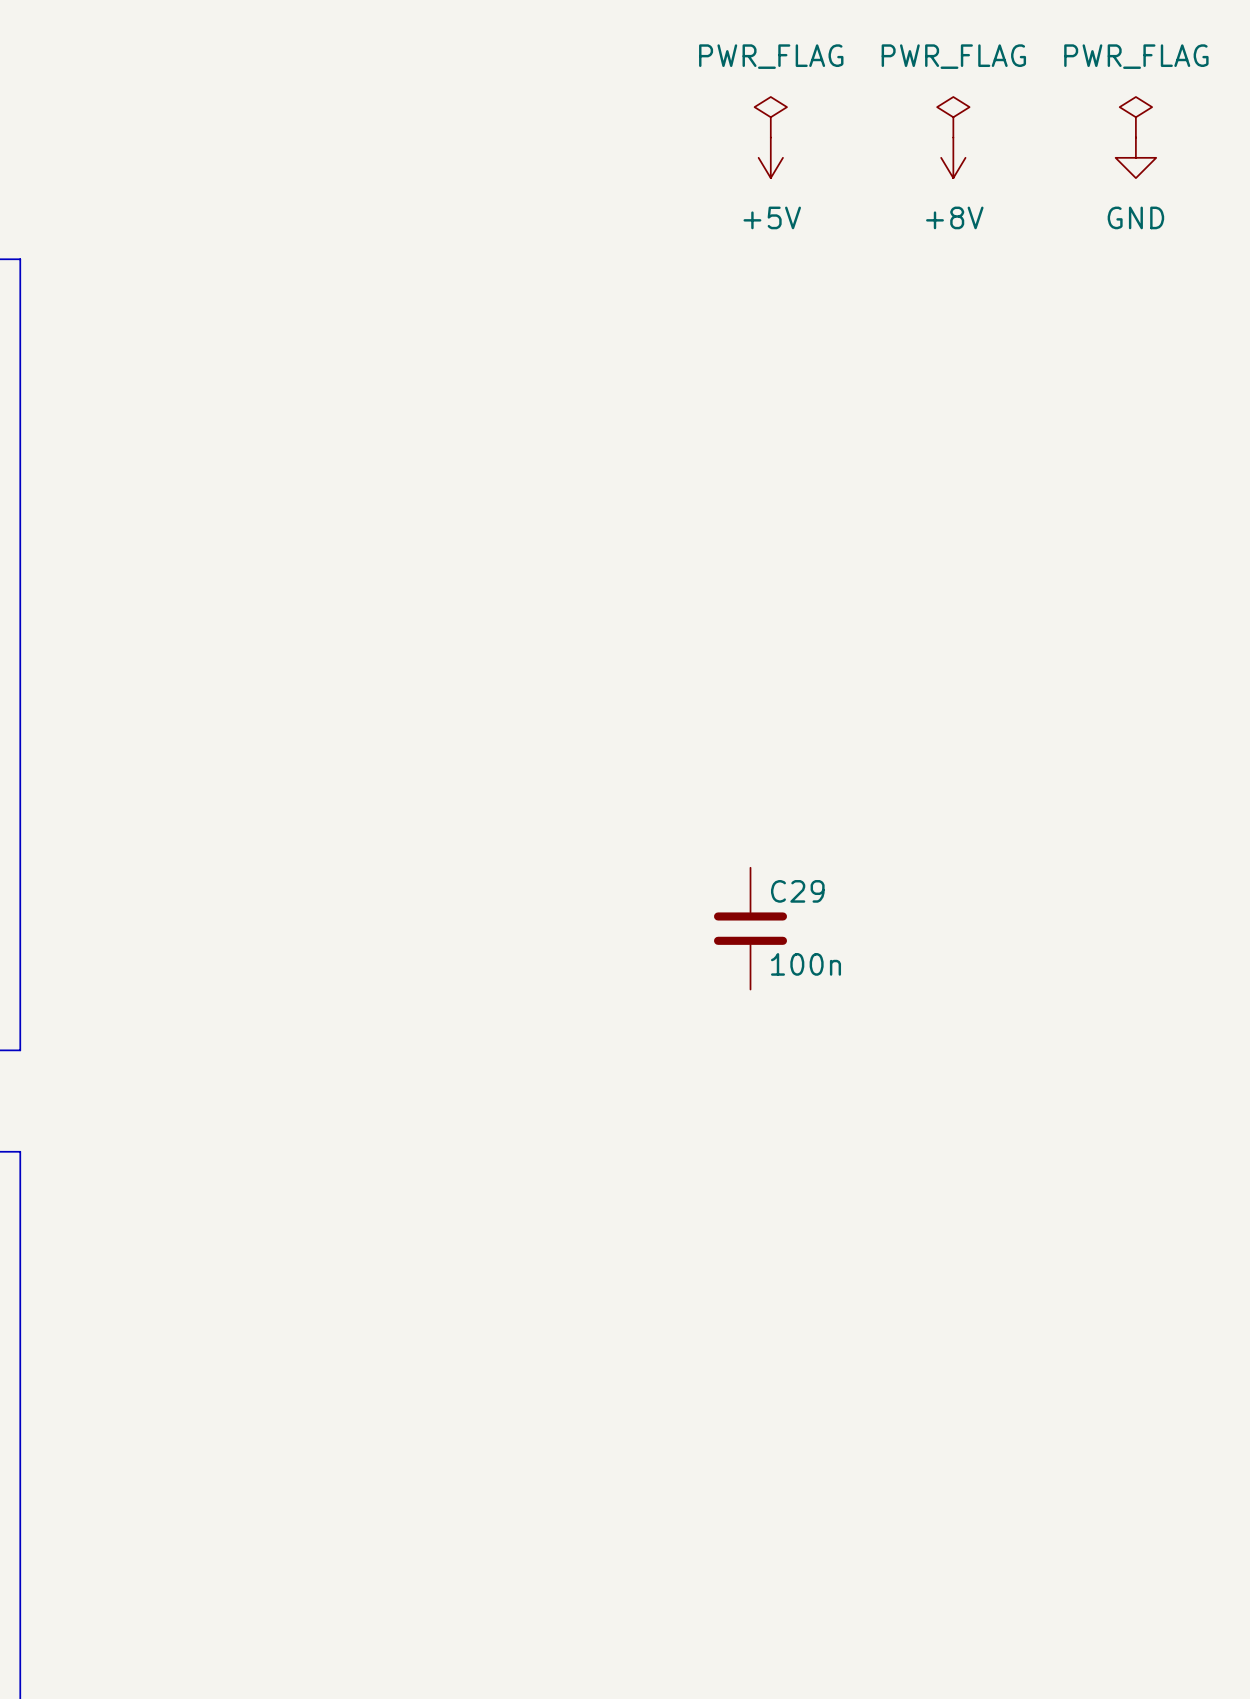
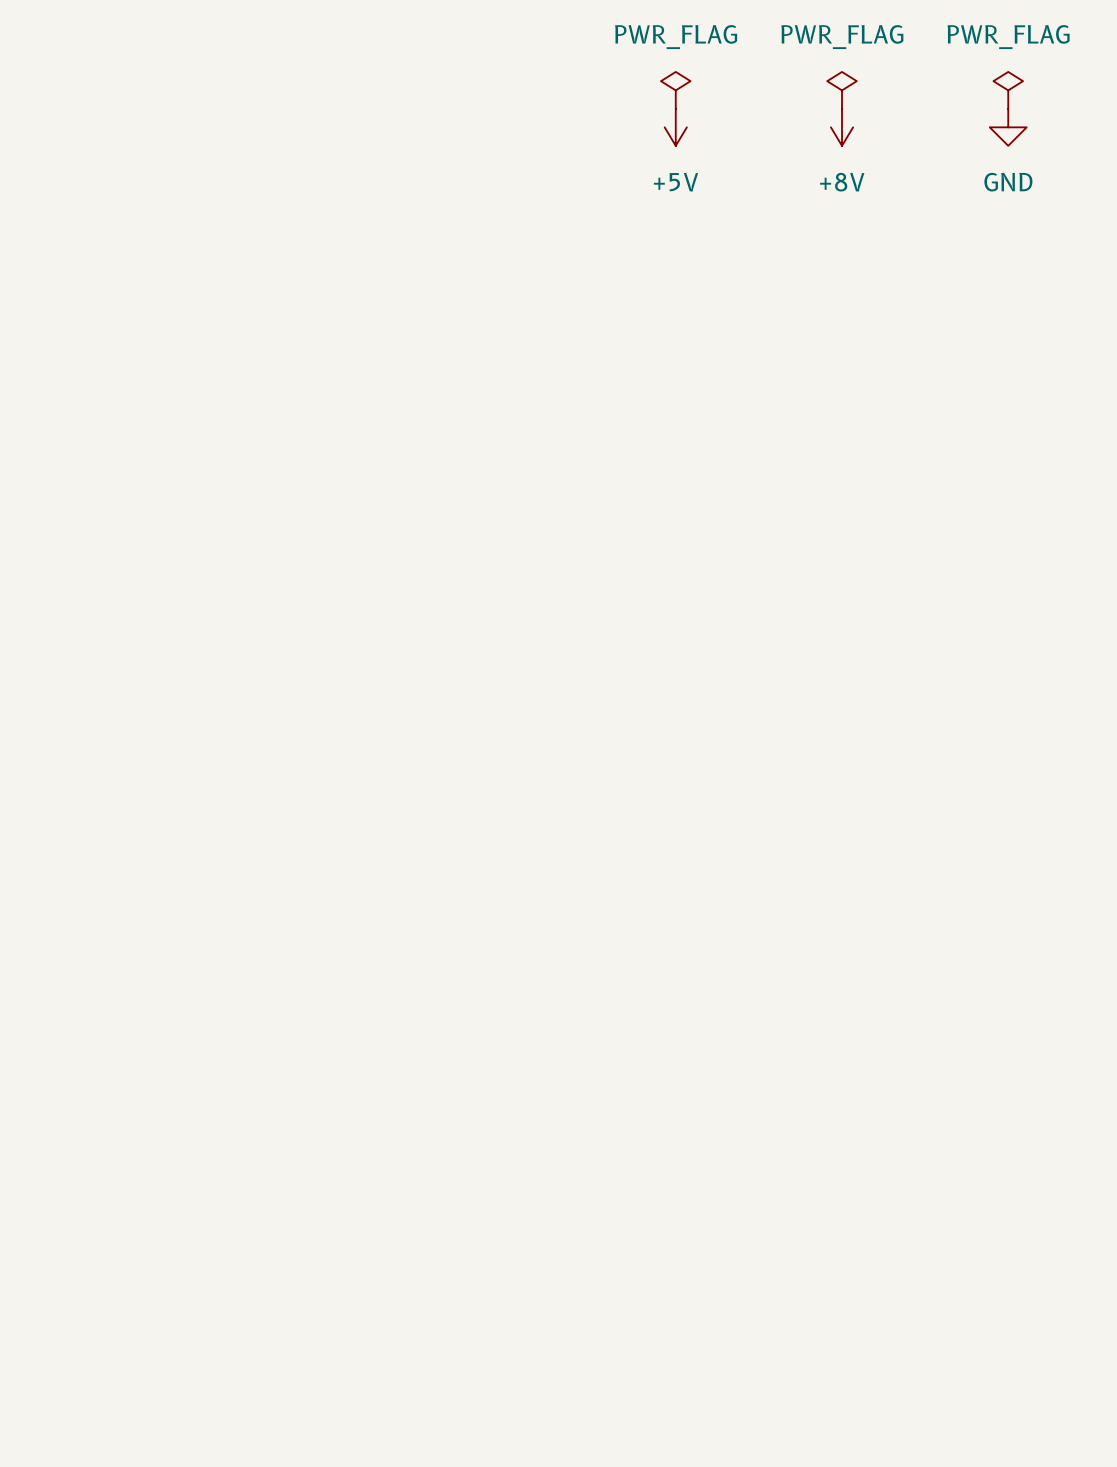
C29: 100n (750, 928) -> none

